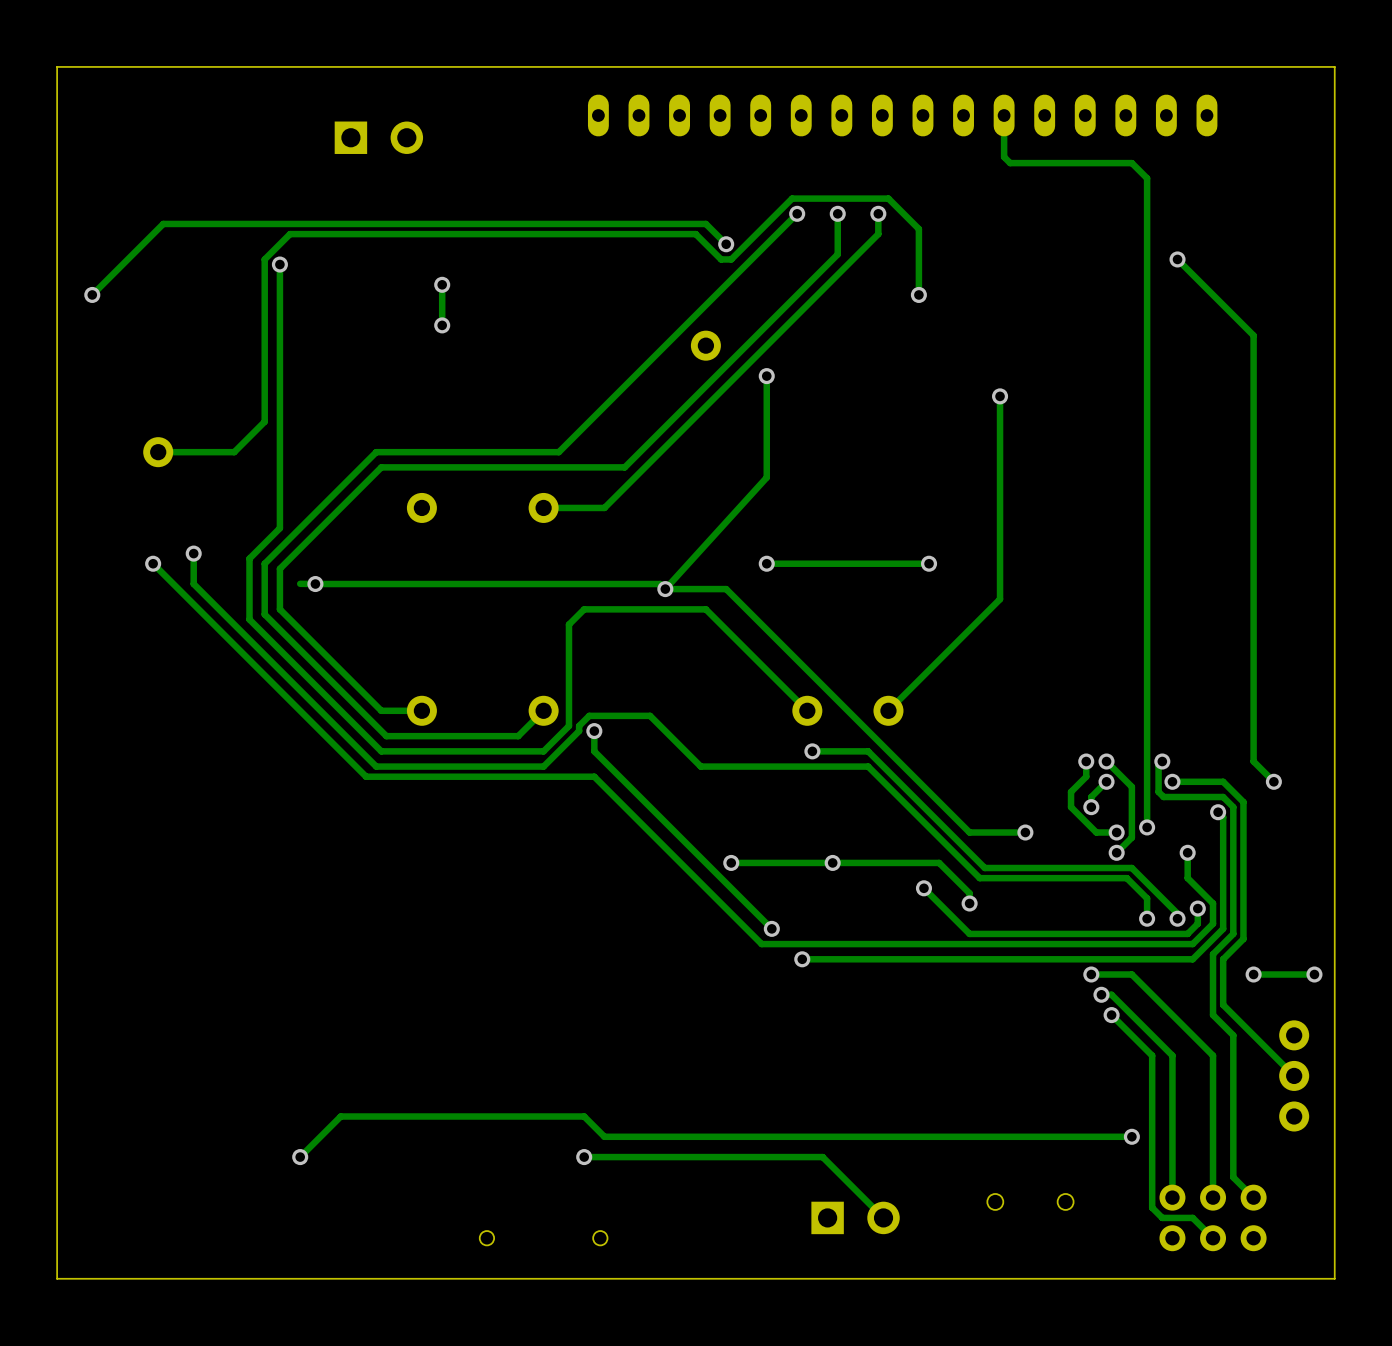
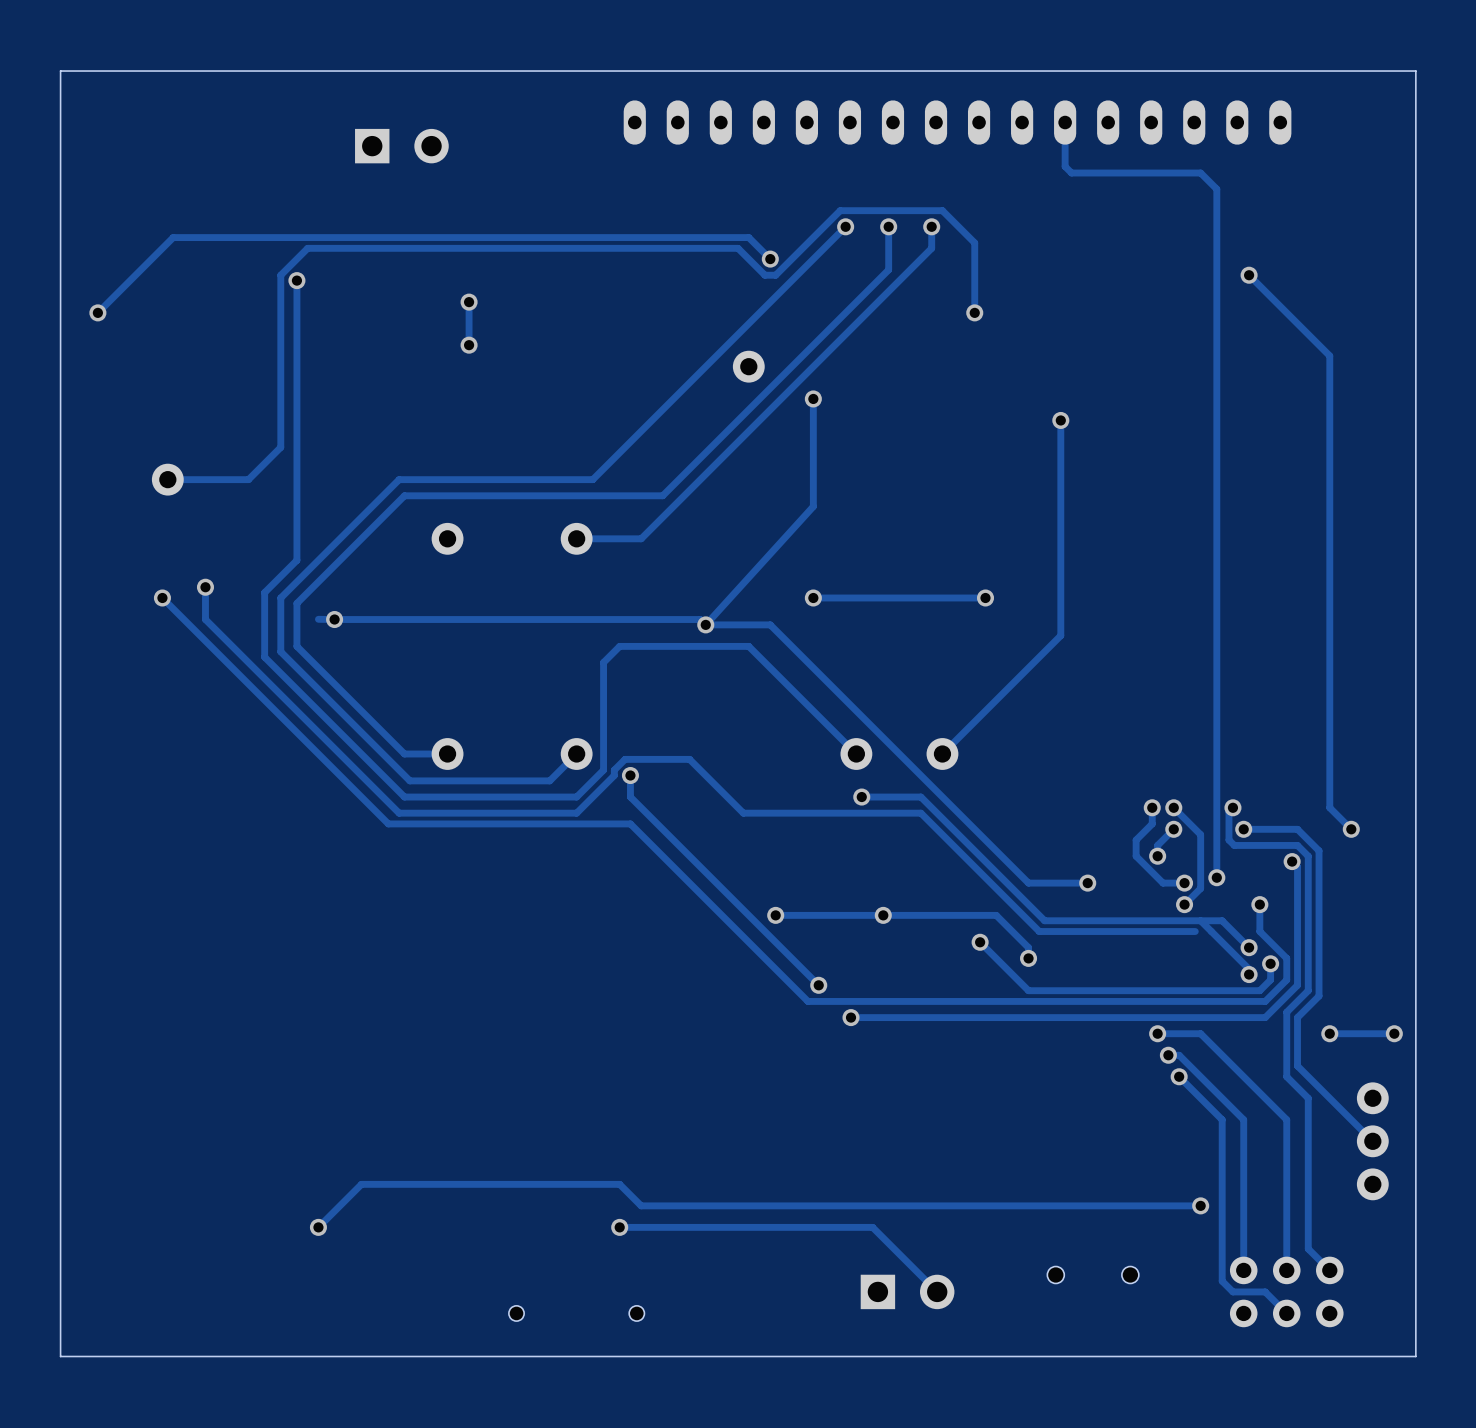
track: none -> (1200, 920) (1222, 920) (1249, 947)
track: (1126, 878) (1147, 898) (1147, 918) -> none
via position: (1147, 918) -> (1249, 947)

